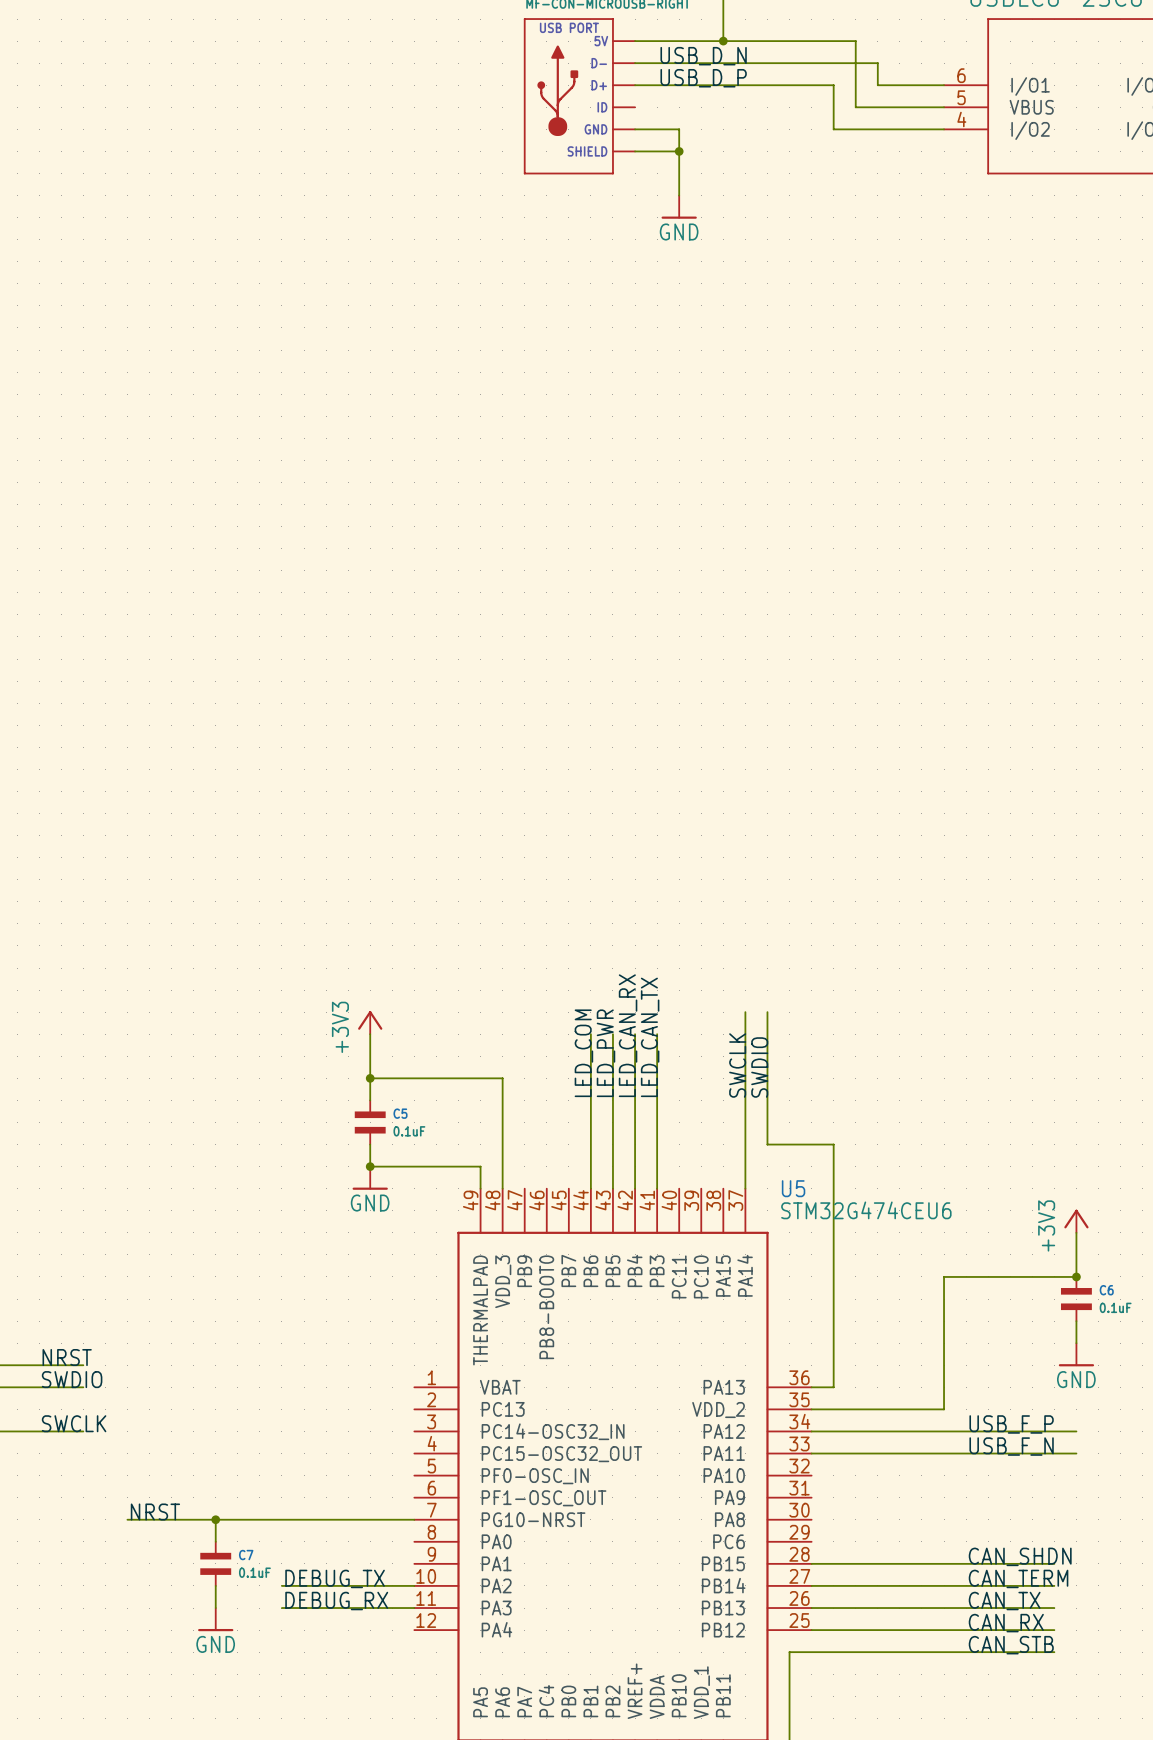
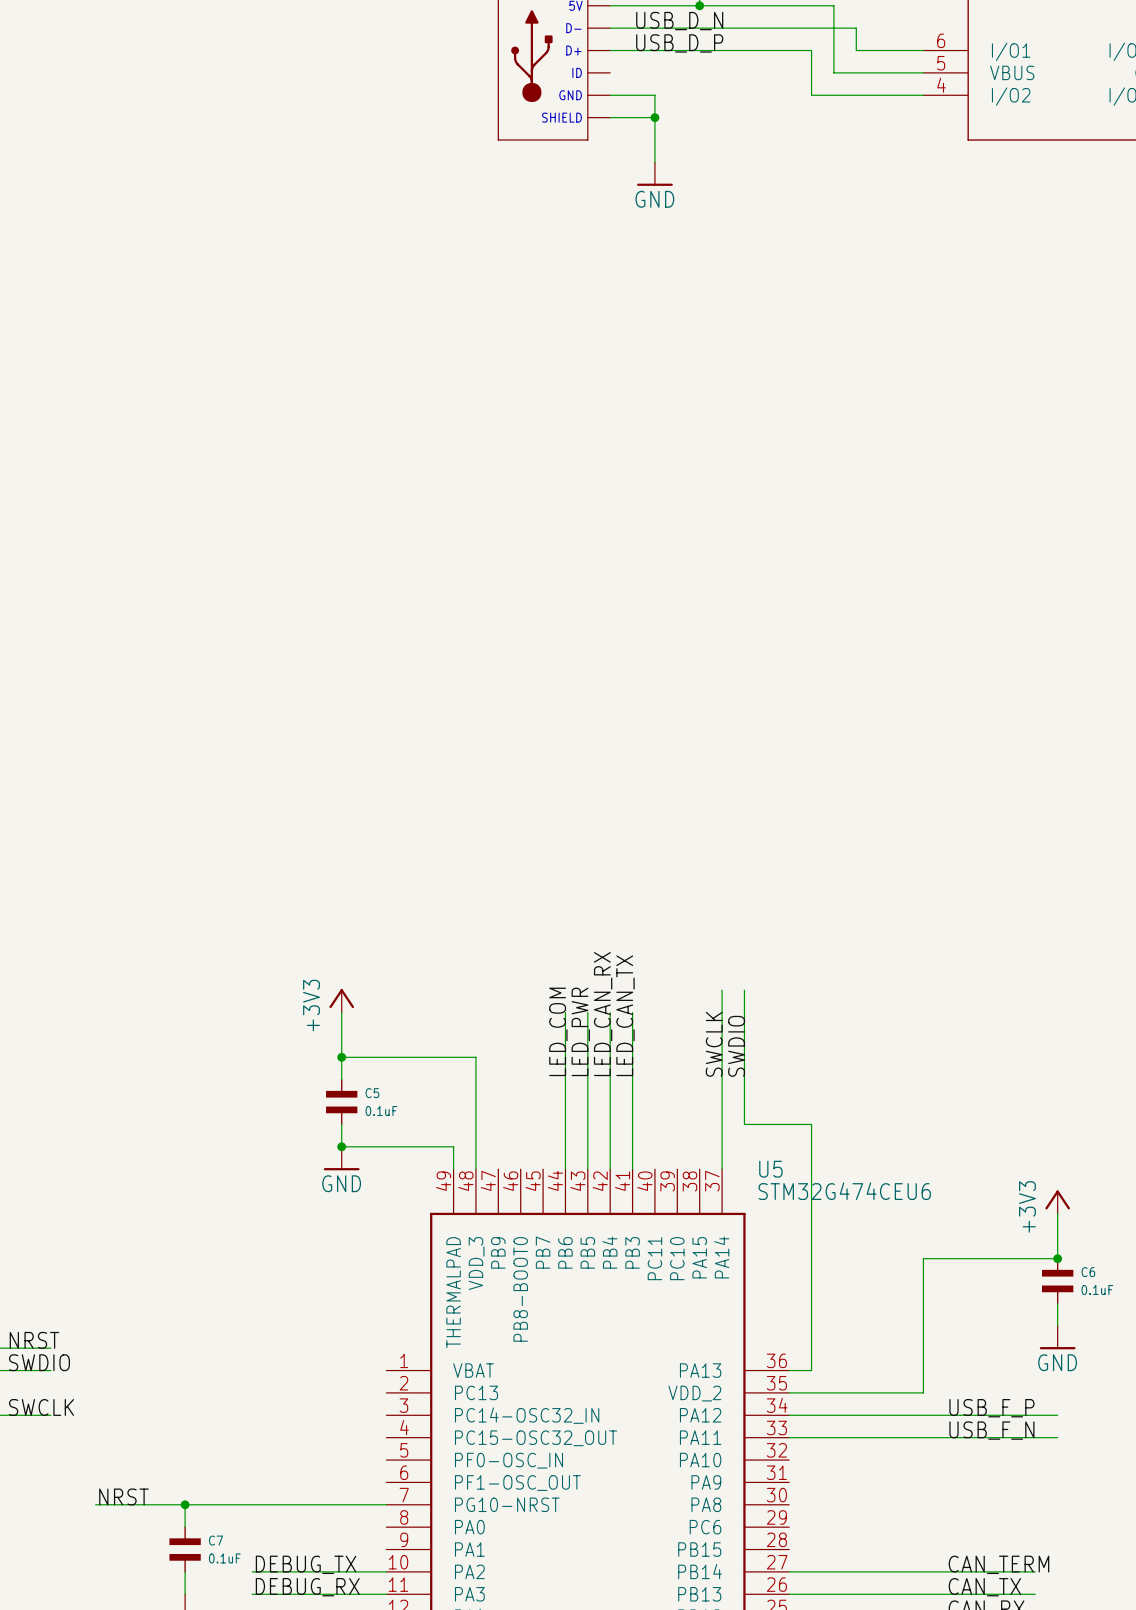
label: CAN_SHDN (1020, 1556) -> none
wire: (811, 1563) (1054, 1563) -> none

